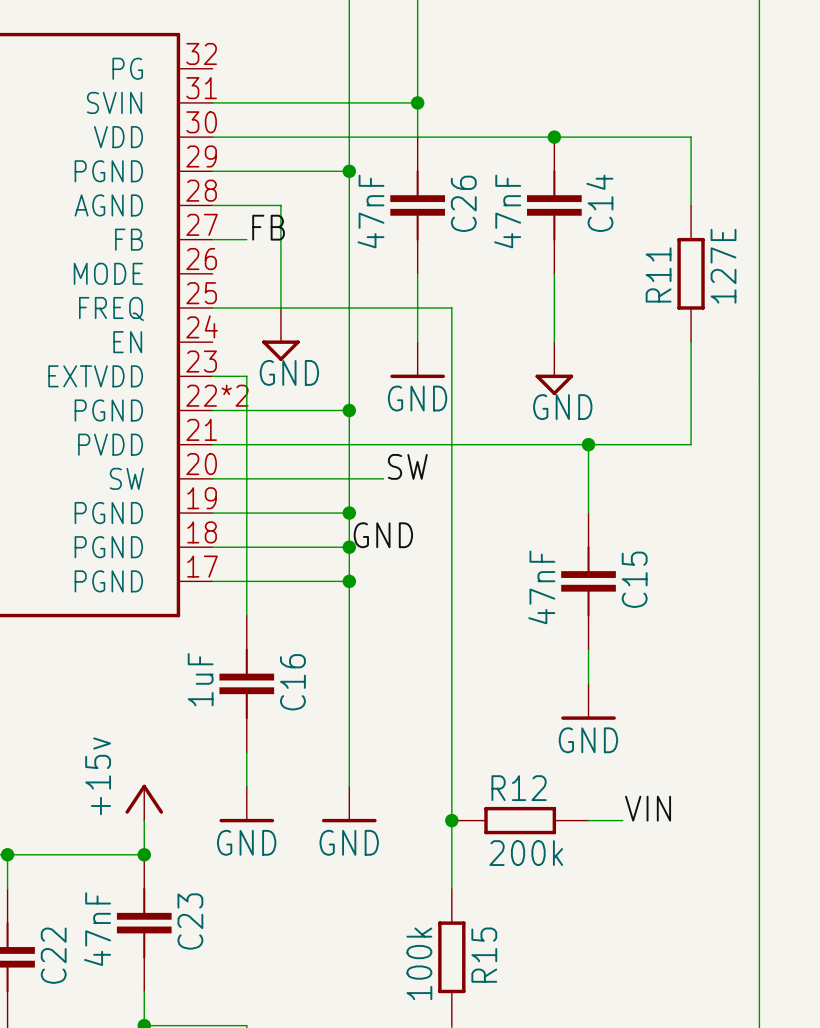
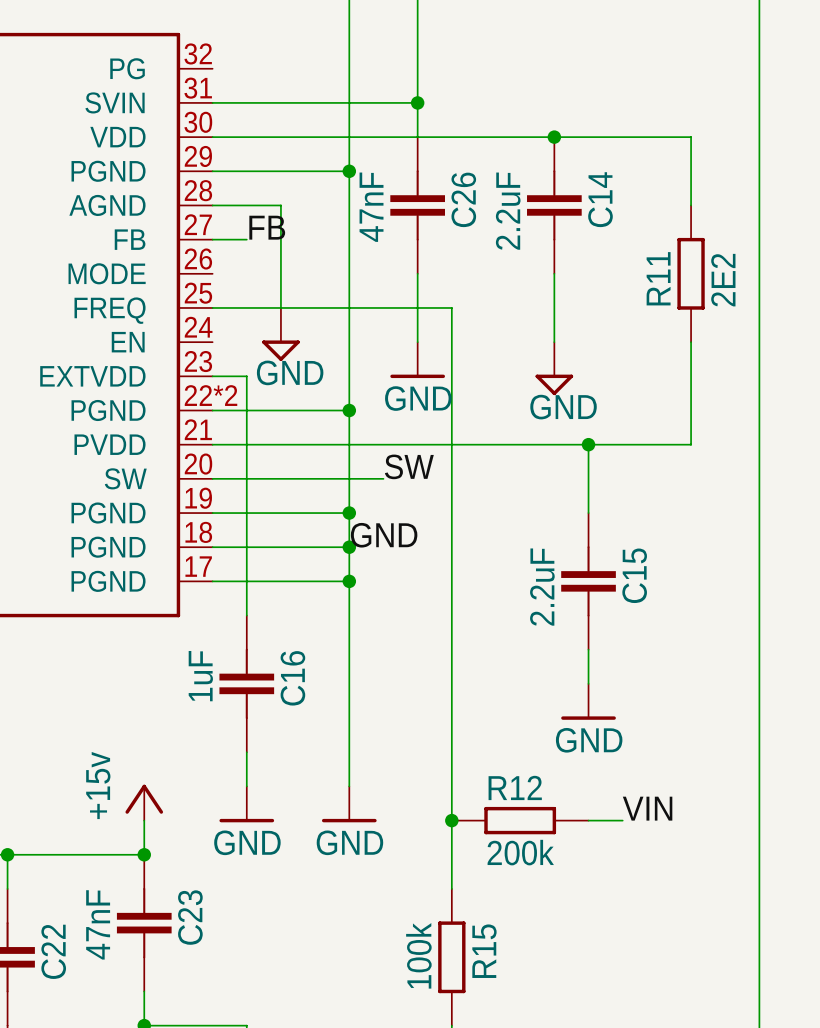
C14 value: 47nF (507, 211) -> 2.2uF (508, 211)
R11 value: 127E (723, 266) -> 2E2 (723, 280)
C15 value: 47nF (541, 587) -> 2.2uF (542, 587)

